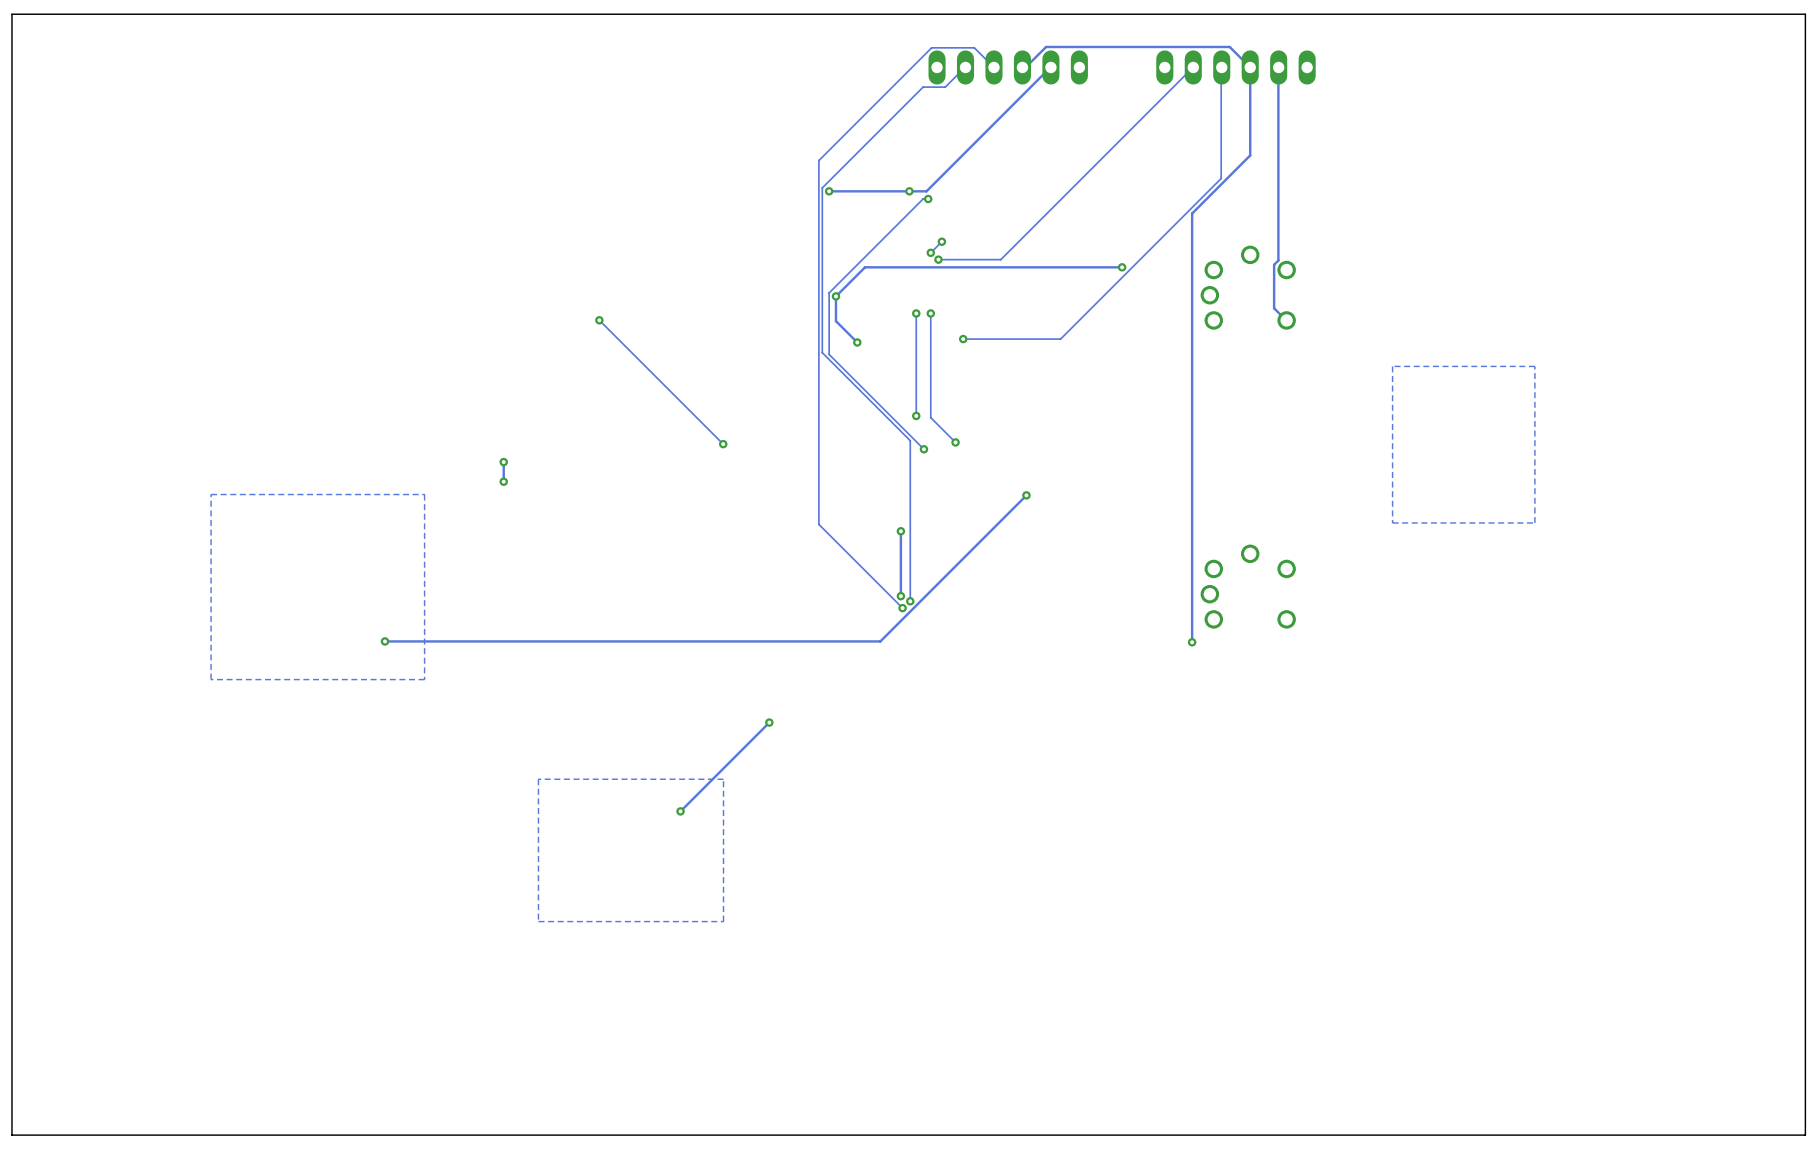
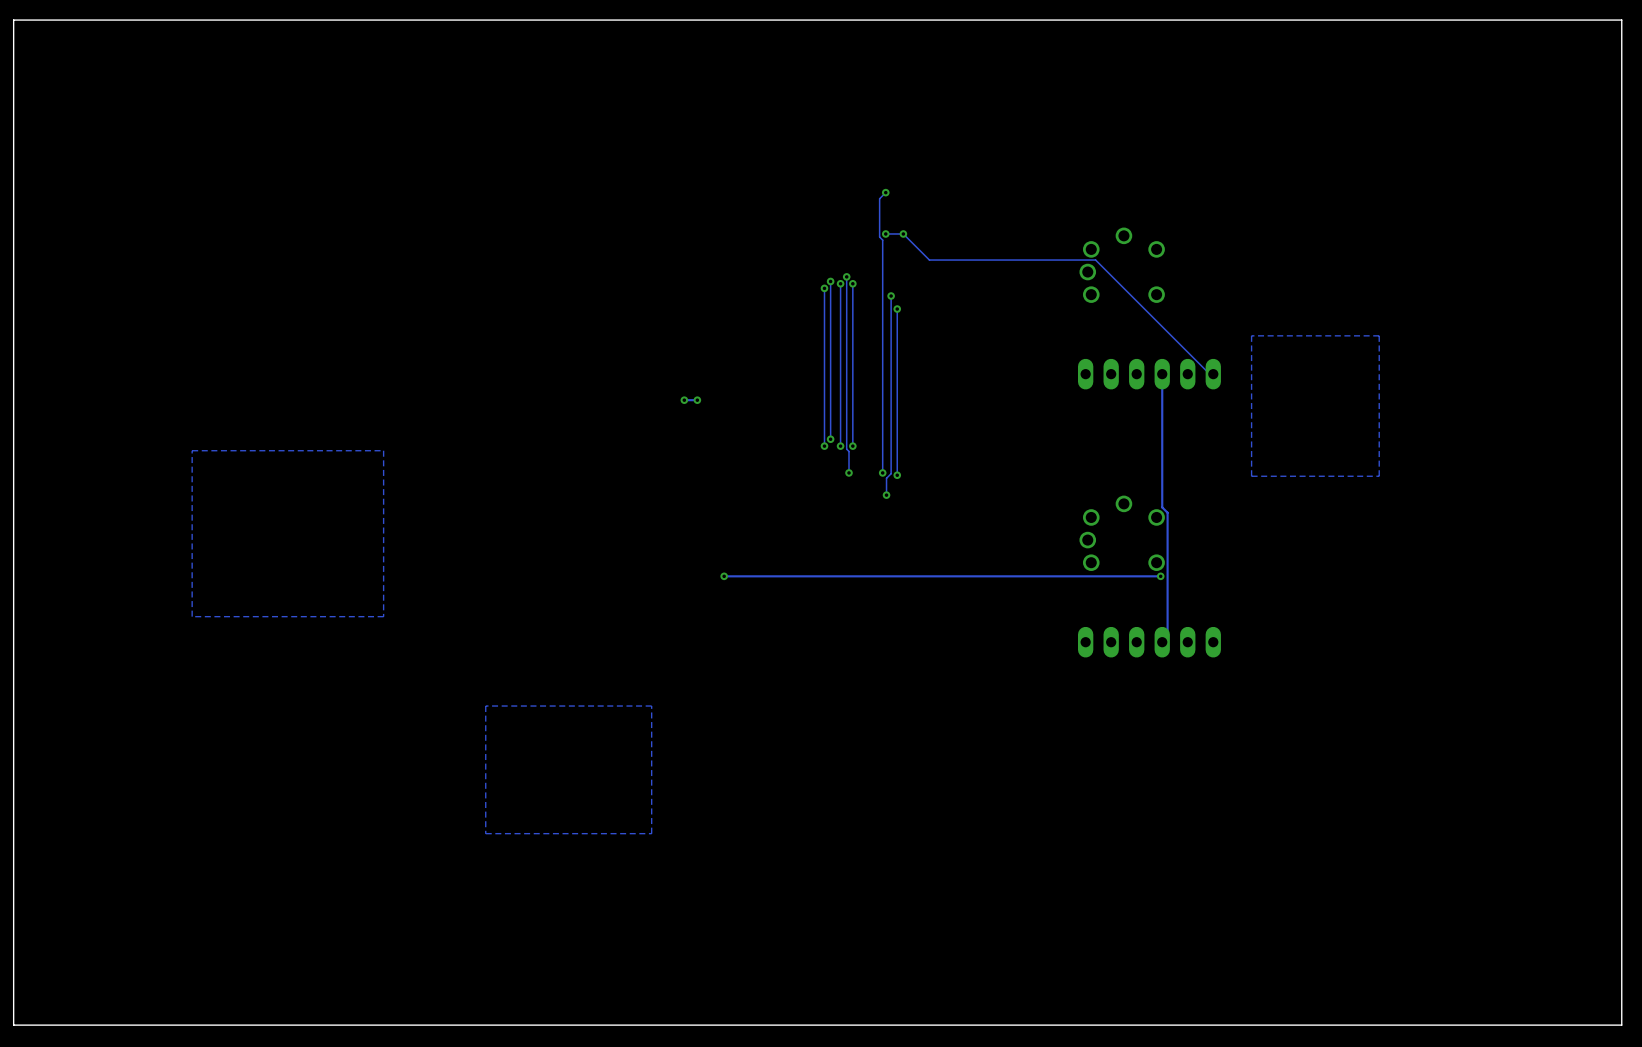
track: (965, 67) (945, 87) (923, 87) (822, 187) (822, 352) (910, 440) (910, 601) -> none
track: (993, 67) (974, 47) (931, 47) (818, 160) (818, 524) (902, 608) -> none
part: (1008, 67) -> none
track: (1022, 67) (1025, 67) (1046, 46) (1229, 46) (1250, 67) (1250, 155) (1192, 213) (1192, 642) -> none
track: (1050, 67) (926, 191) (829, 191) -> none
track: (1193, 67) (1000, 259) (938, 259) -> none
track: (1221, 67) (1221, 178) (1060, 339) (963, 339) -> none
part: (1235, 67) -> none
track: (1278, 67) (1278, 260) (1274, 264) (1274, 308) (1286, 320) -> none
via: (829, 191) -> none
via: (909, 191) -> none
track: (928, 199) (923, 199) (829, 292) (829, 354) (923, 449) -> none
via: (928, 199) -> none
track: none -> (885, 192) (879, 198) (879, 237) (882, 240) (882, 472)
via: none -> (885, 192)
track: (941, 241) (930, 252) -> none
via: (941, 241) -> none
via: (930, 252) -> none
track: none -> (885, 233) (903, 233) (929, 260) (1095, 260) (1209, 374) (1213, 374)
via: none -> (885, 233)
via: none -> (903, 233)
via: (938, 259) -> none
track: (1122, 267) (865, 267) (835, 296) (835, 321) (857, 342) -> none
via: (1122, 267) -> none
via: (835, 296) -> none
track: none -> (846, 276) (846, 449) (849, 451) (849, 472)
via: none -> (846, 276)
track: none -> (830, 281) (830, 439)
via: none -> (830, 281)
track: none -> (840, 283) (840, 446)
via: none -> (840, 283)
track: none -> (852, 283) (852, 446)
via: none -> (852, 283)
track: (930, 313) (930, 417) (955, 442) -> none
via: (930, 313) -> none
track: (599, 320) (723, 444) -> none
via: (599, 320) -> none
track: none -> (891, 296) (891, 473) (886, 478) (886, 495)
via: none -> (891, 296)
track: none -> (897, 309) (897, 475)
via: none -> (897, 309)
via: (963, 339) -> none
via: (857, 342) -> none
part: none -> (1149, 374)
track: none -> (1162, 374) (1162, 507) (1167, 512) (1167, 636) (1162, 642)
track: none -> (824, 380) (824, 446)
via: (916, 415) -> none
via: none -> (684, 400)
track: none -> (697, 400) (684, 400)
via: none -> (697, 400)
via: (955, 442) -> none
via: (723, 444) -> none
via: (923, 449) -> none
track: (503, 462) (503, 481) -> none
via: (503, 462) -> none
via: (503, 481) -> none
via: none -> (830, 439)
via: none -> (824, 446)
via: none -> (840, 446)
via: none -> (852, 446)
track: (1026, 495) (880, 641) (385, 641) -> none
via: (1026, 495) -> none
via: none -> (849, 472)
via: none -> (882, 472)
via: none -> (897, 475)
track: (900, 531) (900, 596) -> none
via: (900, 531) -> none
via: none -> (886, 495)
via: (900, 596) -> none
via: (910, 601) -> none
via: (902, 608) -> none
via: none -> (724, 576)
track: none -> (1160, 576) (724, 576)
via: none -> (1160, 576)
via: (385, 641) -> none
via: (1192, 642) -> none
part: none -> (1149, 642)
track: (769, 722) (680, 811) -> none
via: (769, 722) -> none
via: (680, 811) -> none

